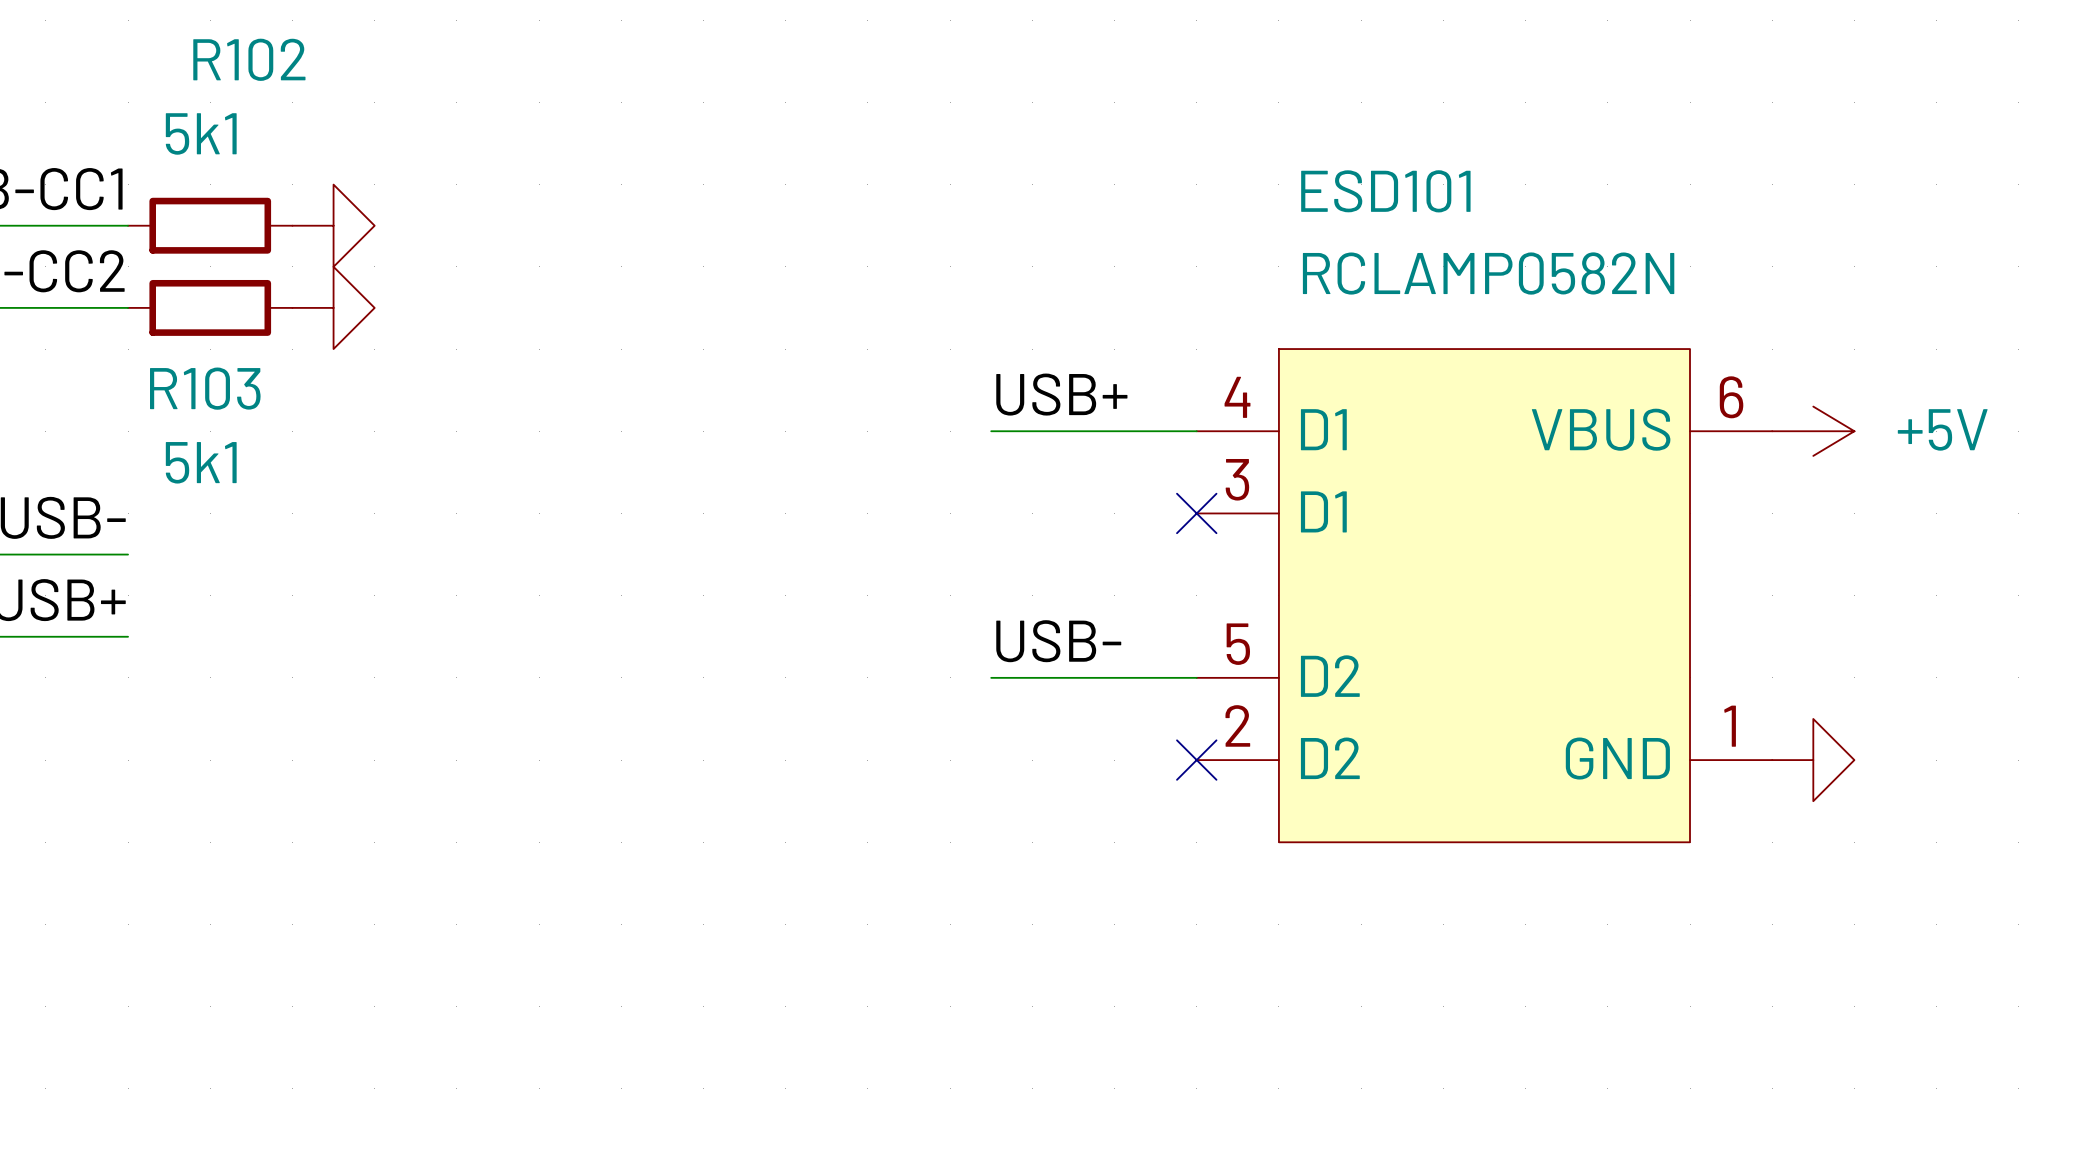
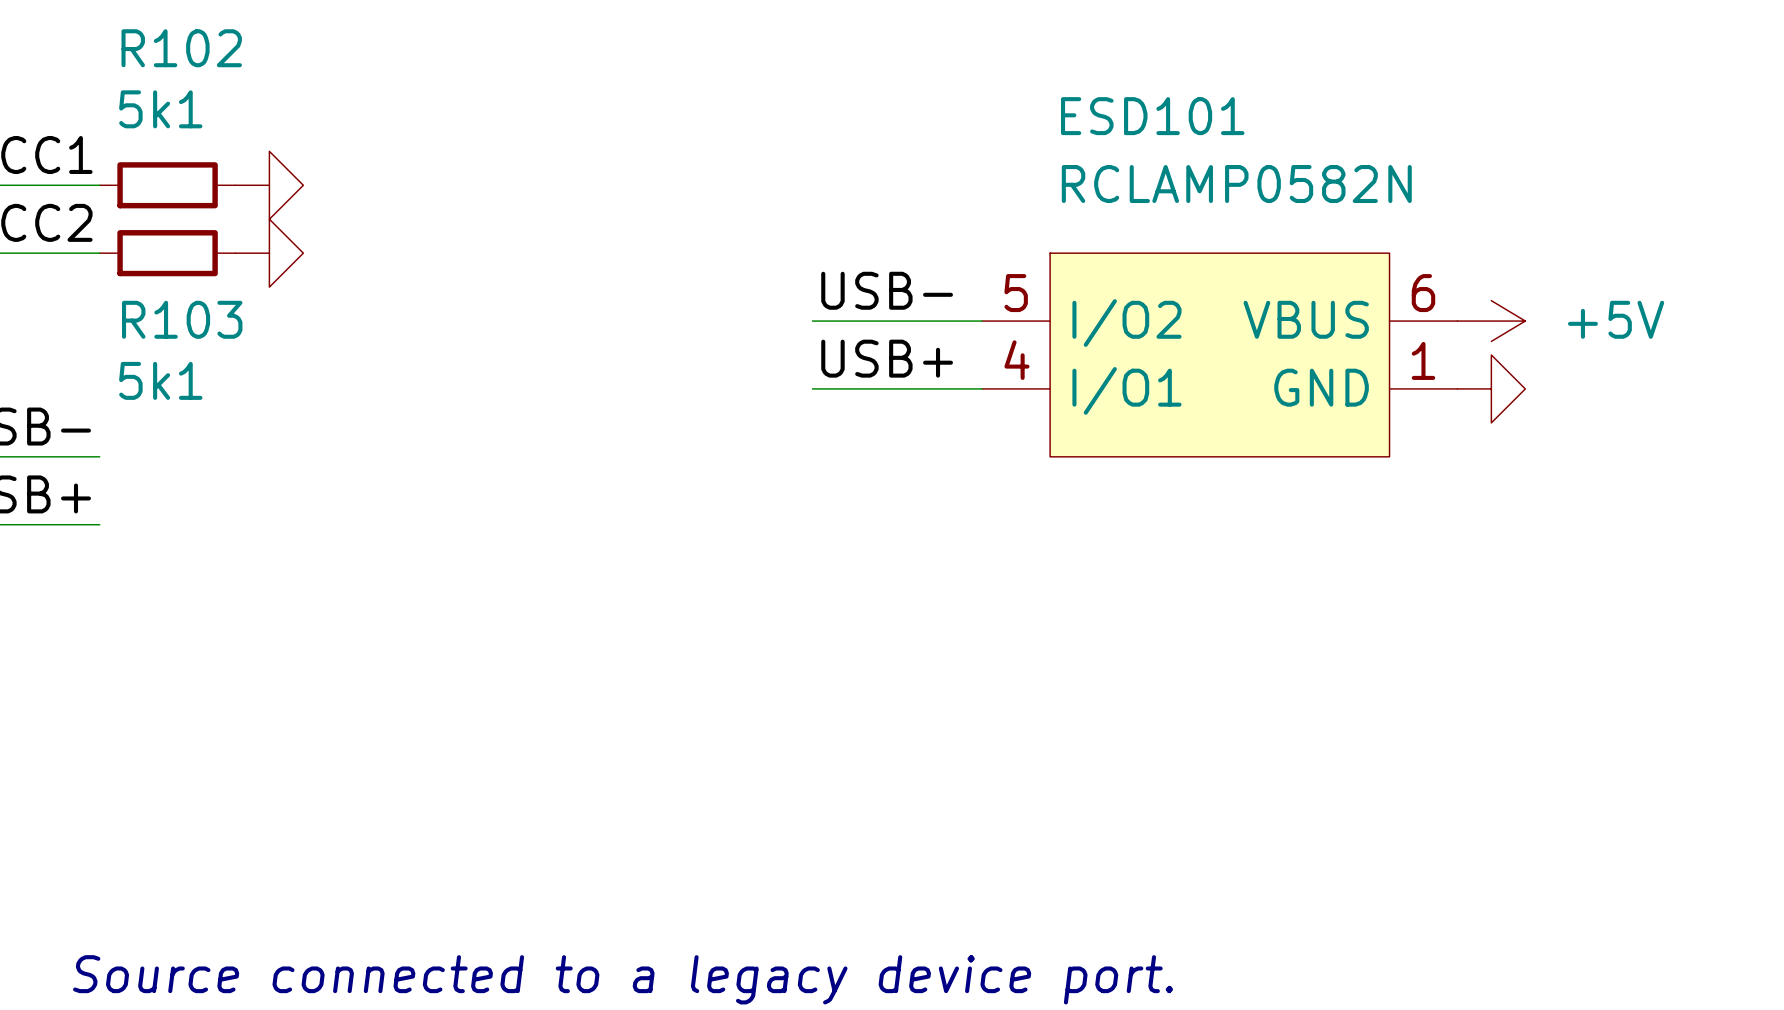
ESD101 name position: ESD101 (1385, 191) -> ESD101 (1152, 116)
ESD101 value position: RCLAMP0582N (1488, 273) -> RCLAMP0582N (1236, 184)
ESD101 symbol: [1196, 349, 1773, 843] -> [982, 253, 1458, 457]
label position: USB+ (1061, 394) -> USB+ (887, 358)
wire: (991, 431) (1196, 431) -> (812, 321) (982, 321)
power symbol position: +5V (1813, 431) -> +5V (1491, 321)
no-connect mark: (1196, 513) -> none
label position: USB- (1058, 641) -> USB- (887, 290)
wire: (991, 677) (1196, 677) -> (812, 388) (982, 388)
no-connect mark: (1196, 760) -> none
power symbol position: (1813, 760) -> (1491, 388)

